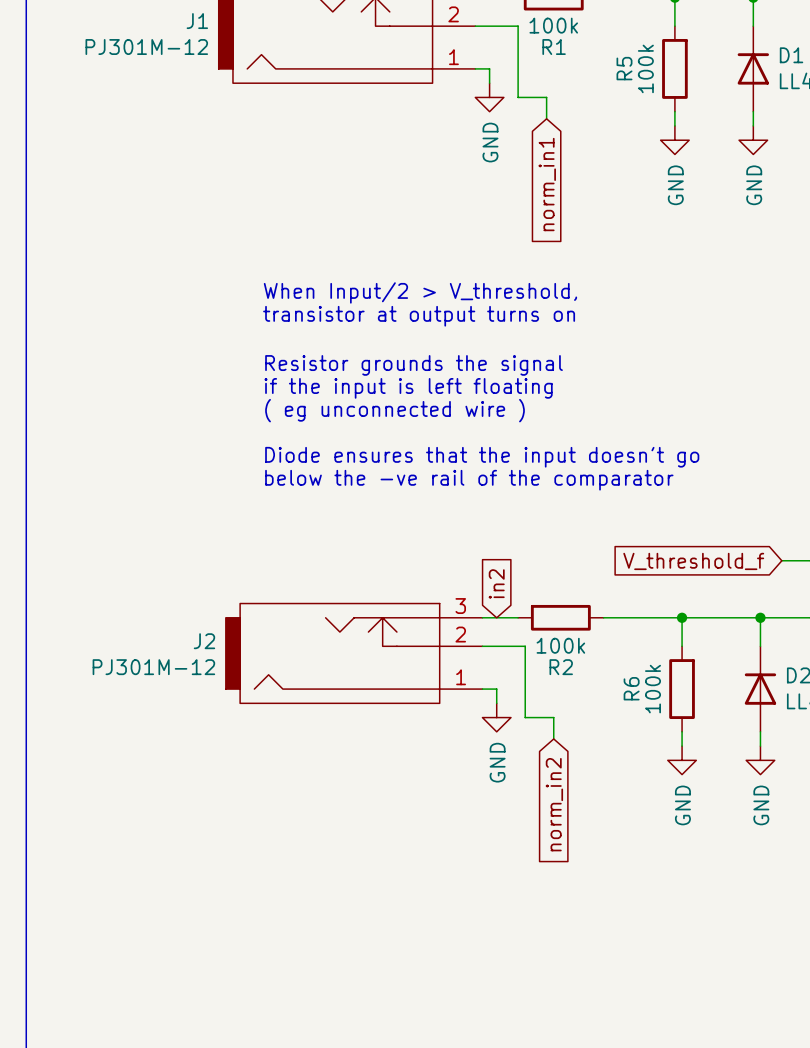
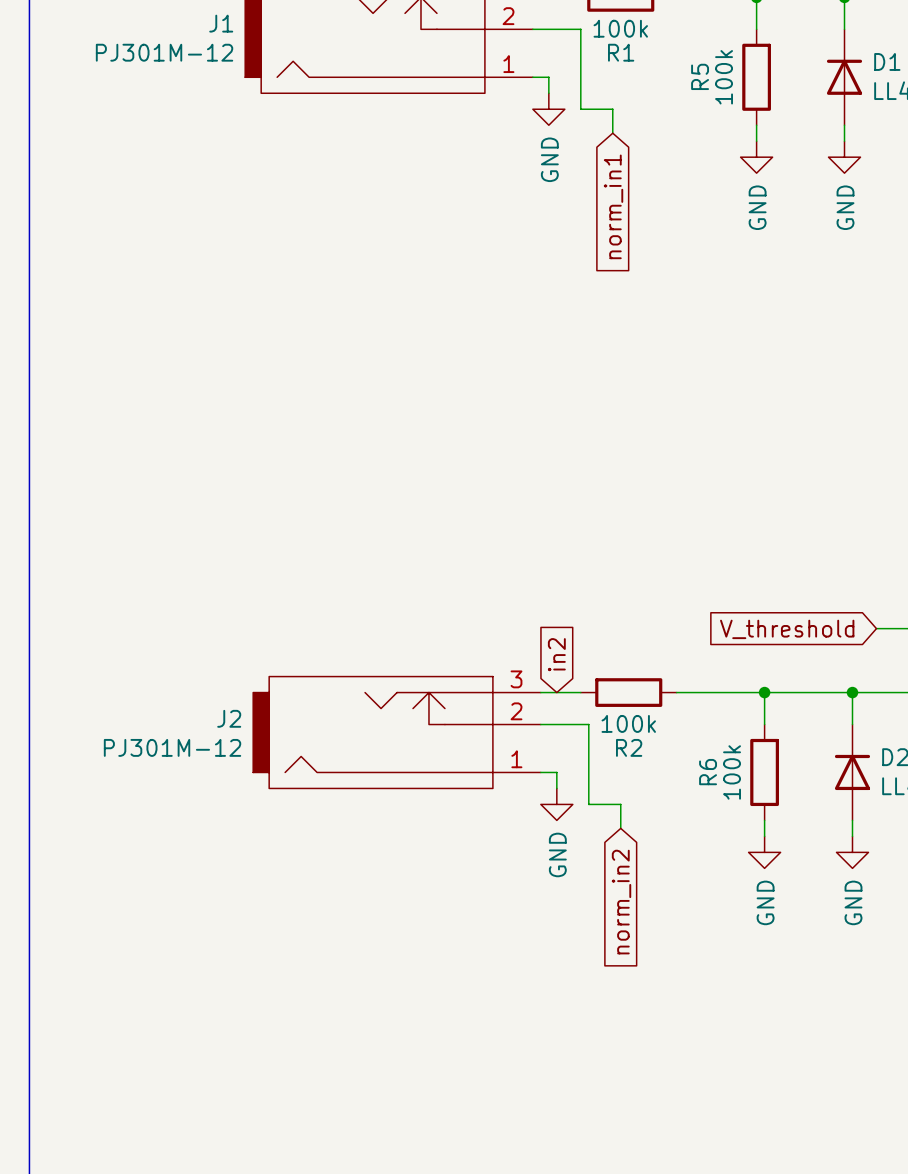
text: When Input/2 > V_threshold, (420, 292) -> none
text: transistor at output turns on (419, 316) -> none
text: Resistor grounds the signal (414, 365) -> none
text: if the input is left floating (408, 388) -> none
text: ( eg unconnected wire ) (394, 410) -> none
text: Diode ensures that the input doesn't go (482, 457) -> none
text: below the -ve rail of the comparator (469, 480) -> none
global label: V_threshold_f (693, 561) -> V_threshold (787, 629)

